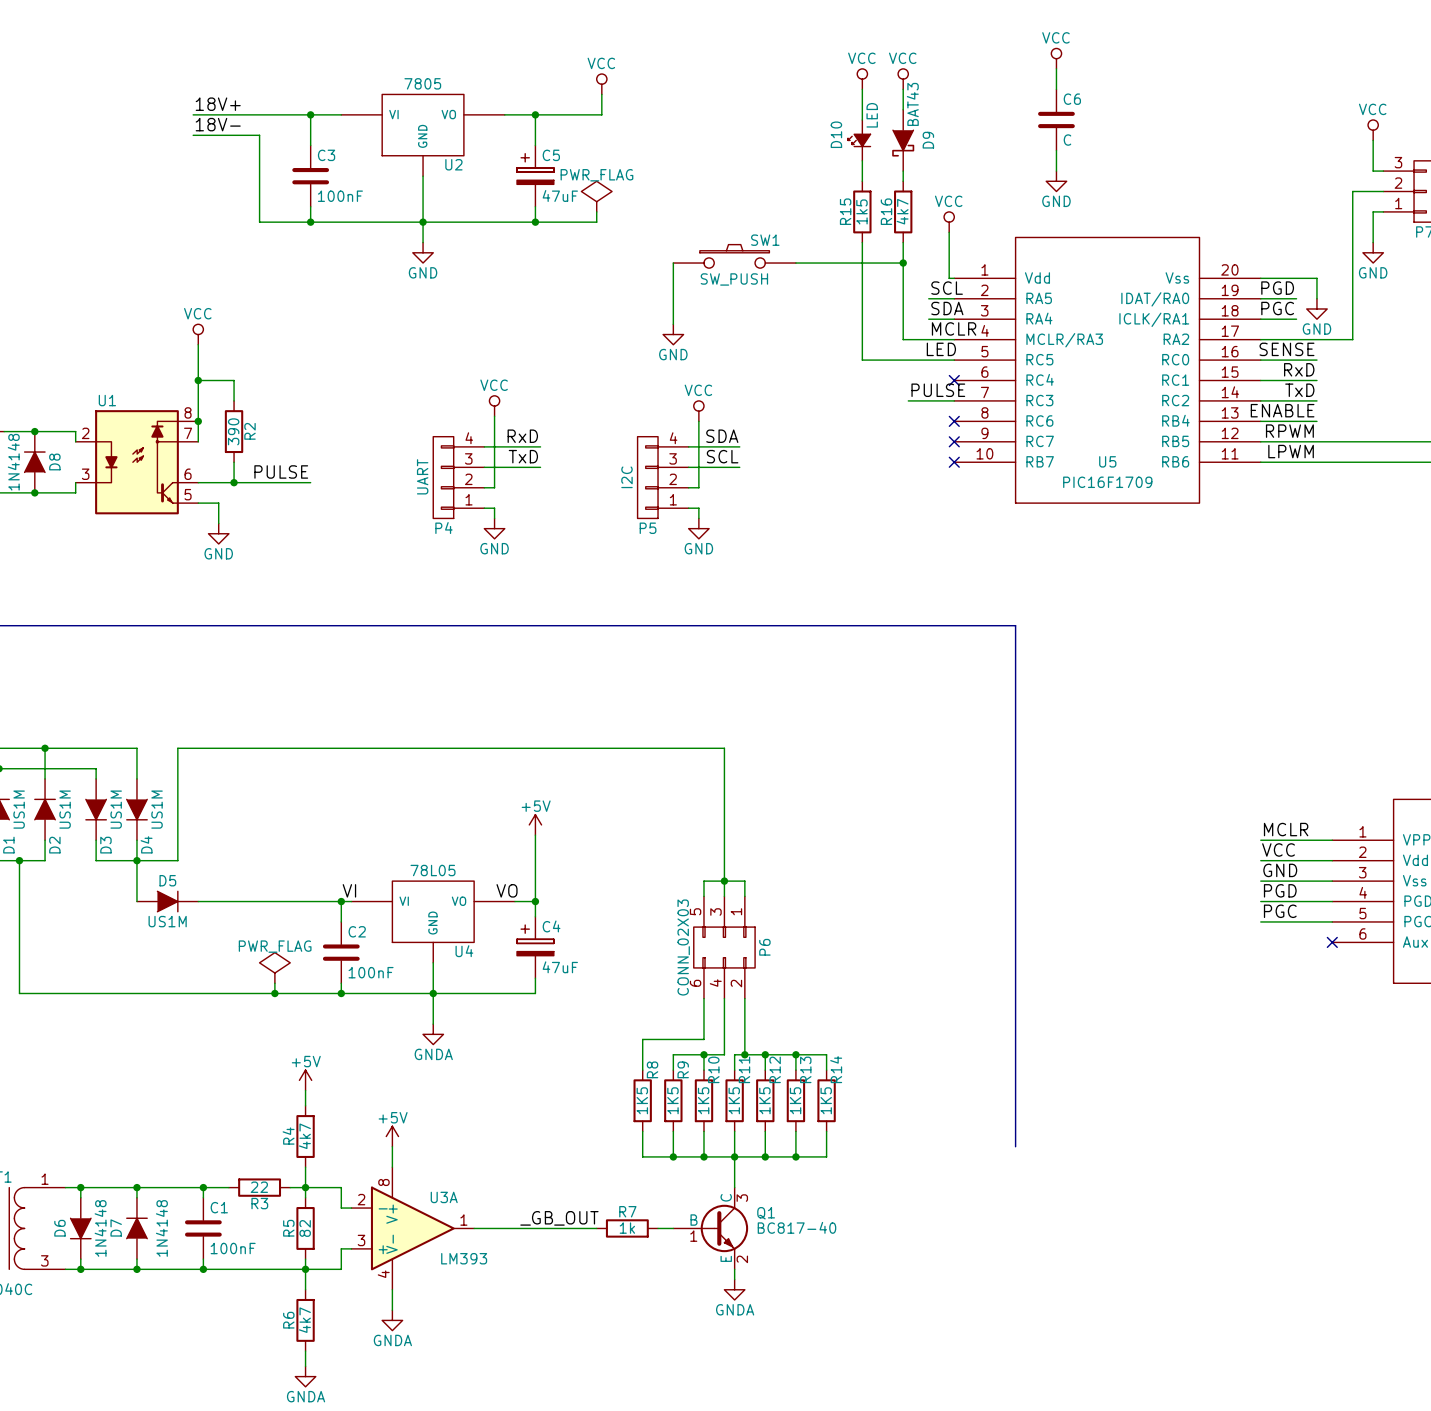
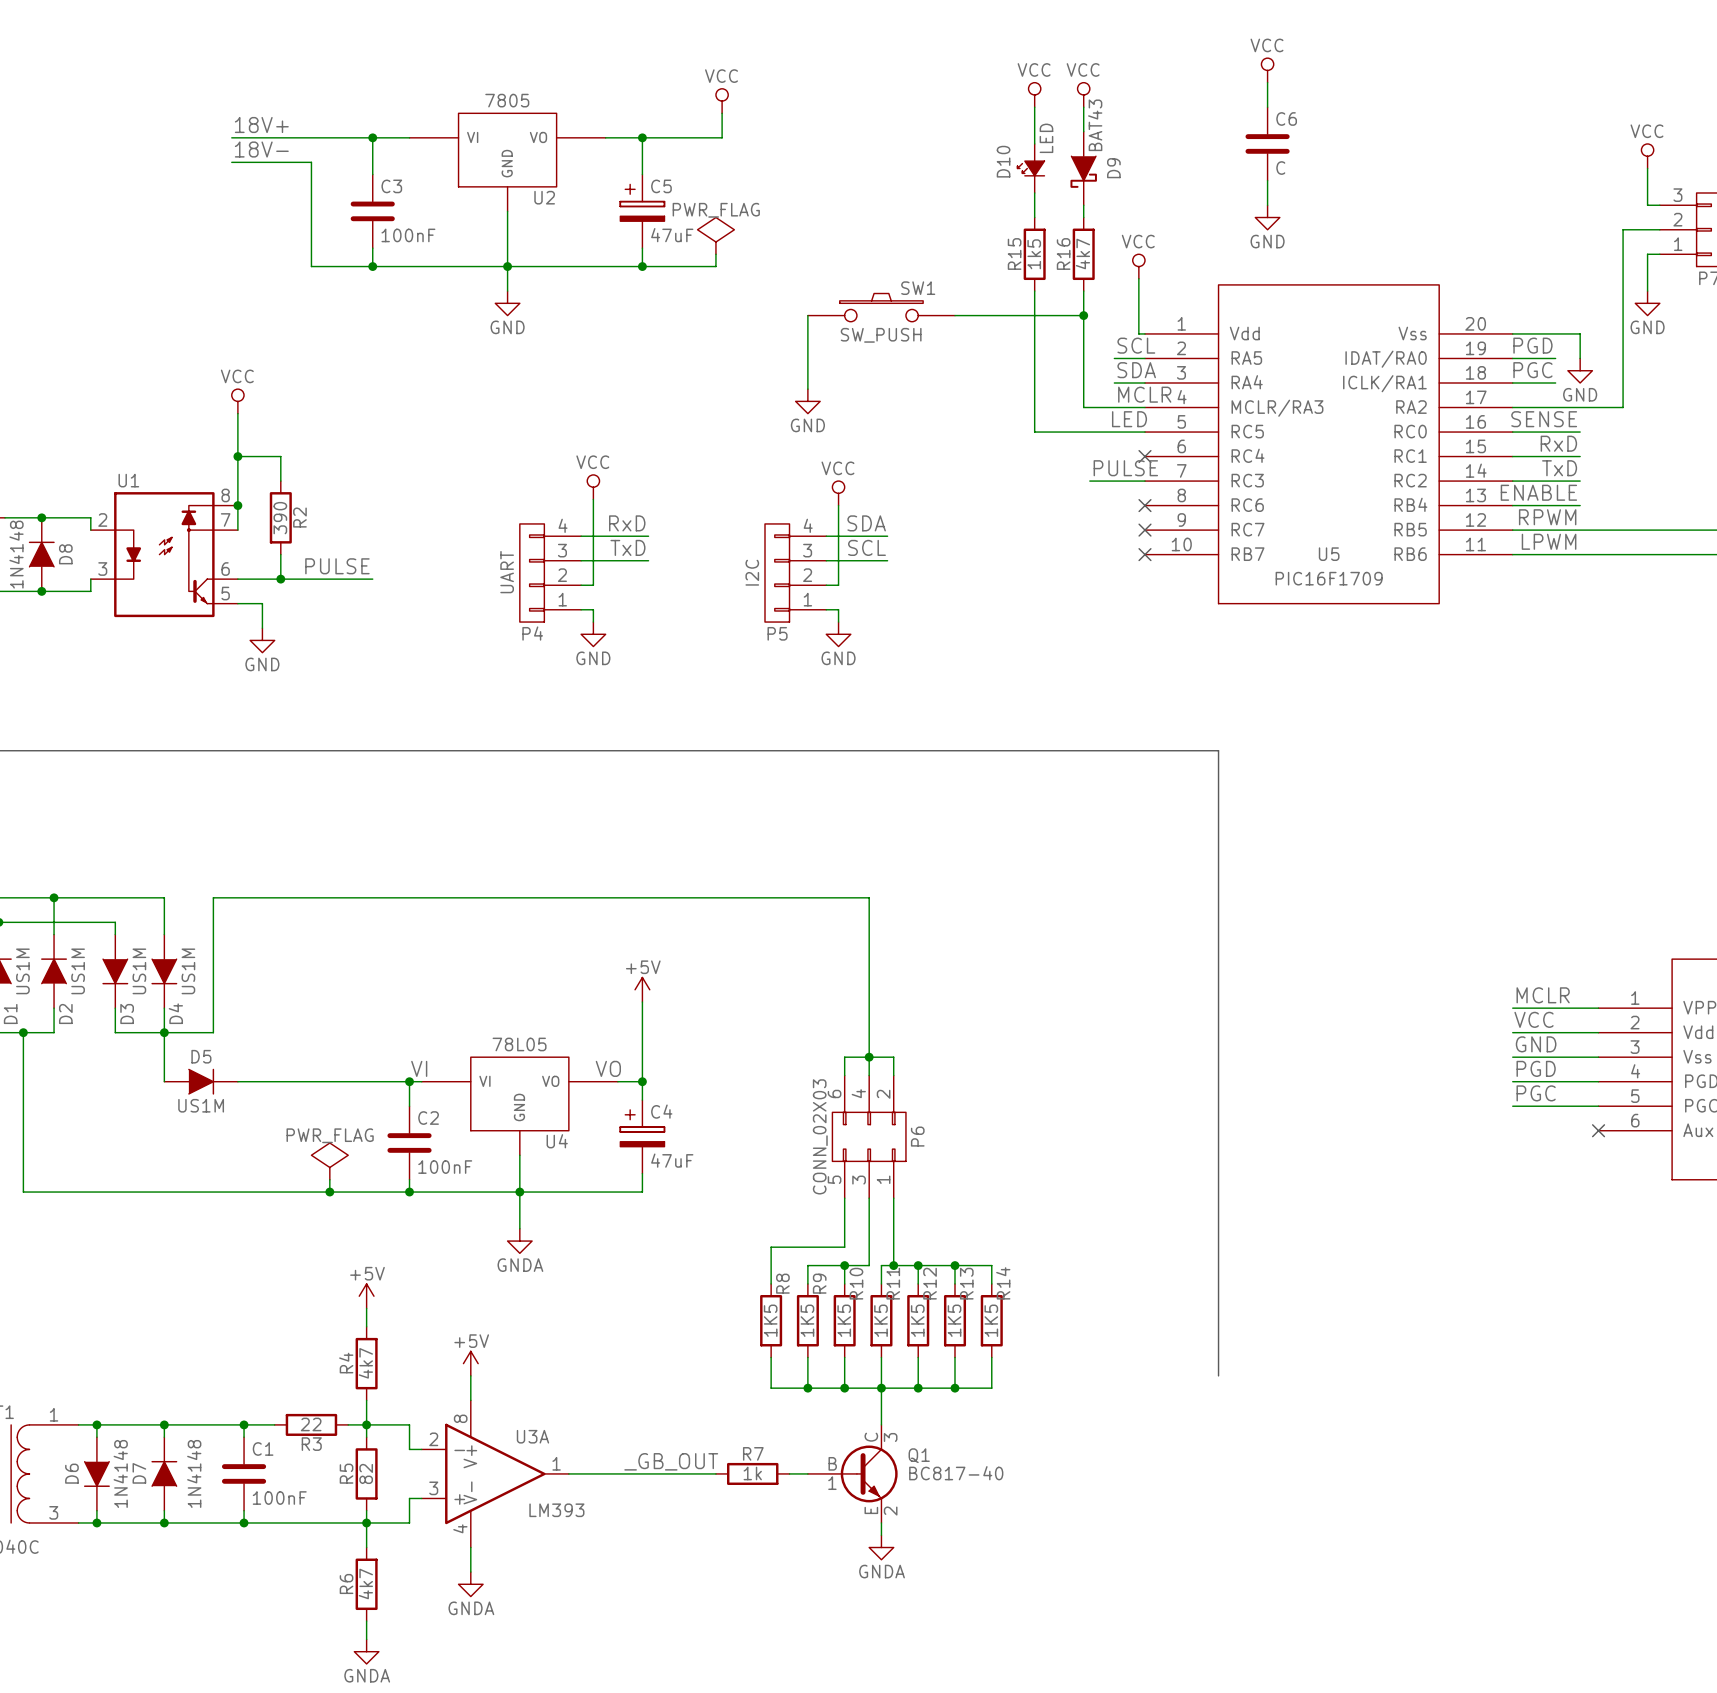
P6 flip: as is (724, 947) -> up-down (869, 1136)

